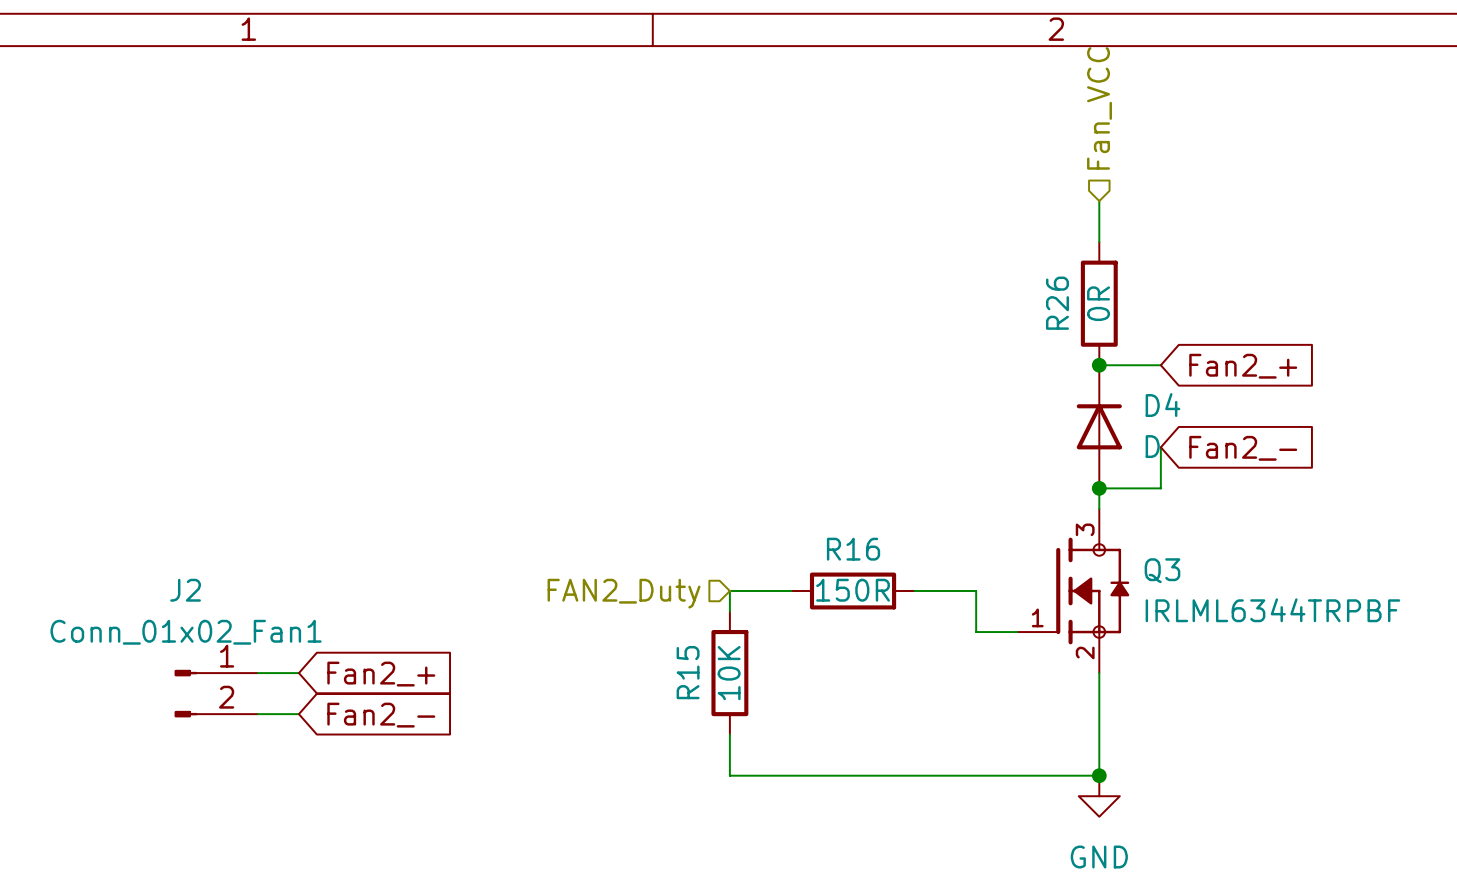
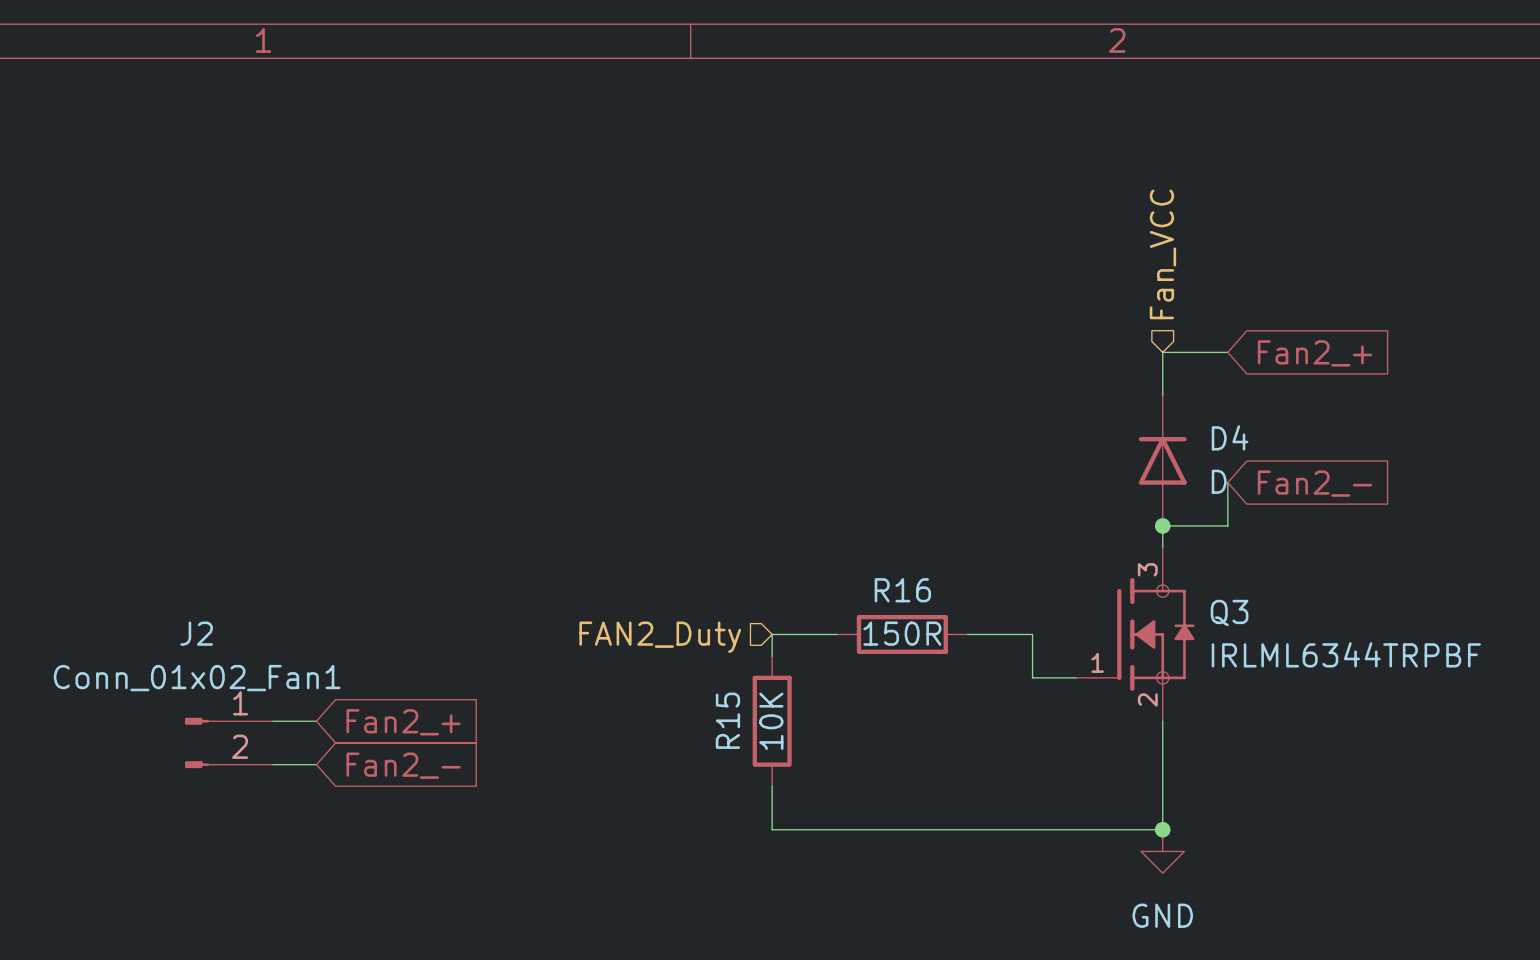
hierarchical label position: Fan_VCC (1099, 108) -> Fan_VCC (1162, 254)
wire: (1099, 201) (1099, 242) -> none
R26: 0R (1099, 303) -> none
wire: (1099, 365) (1160, 365) -> (1162, 395) (1162, 352) (1227, 352)
junction: (1099, 365) -> none
global label position: Fan2_+ (1243, 366) -> Fan2_+ (1314, 353)

